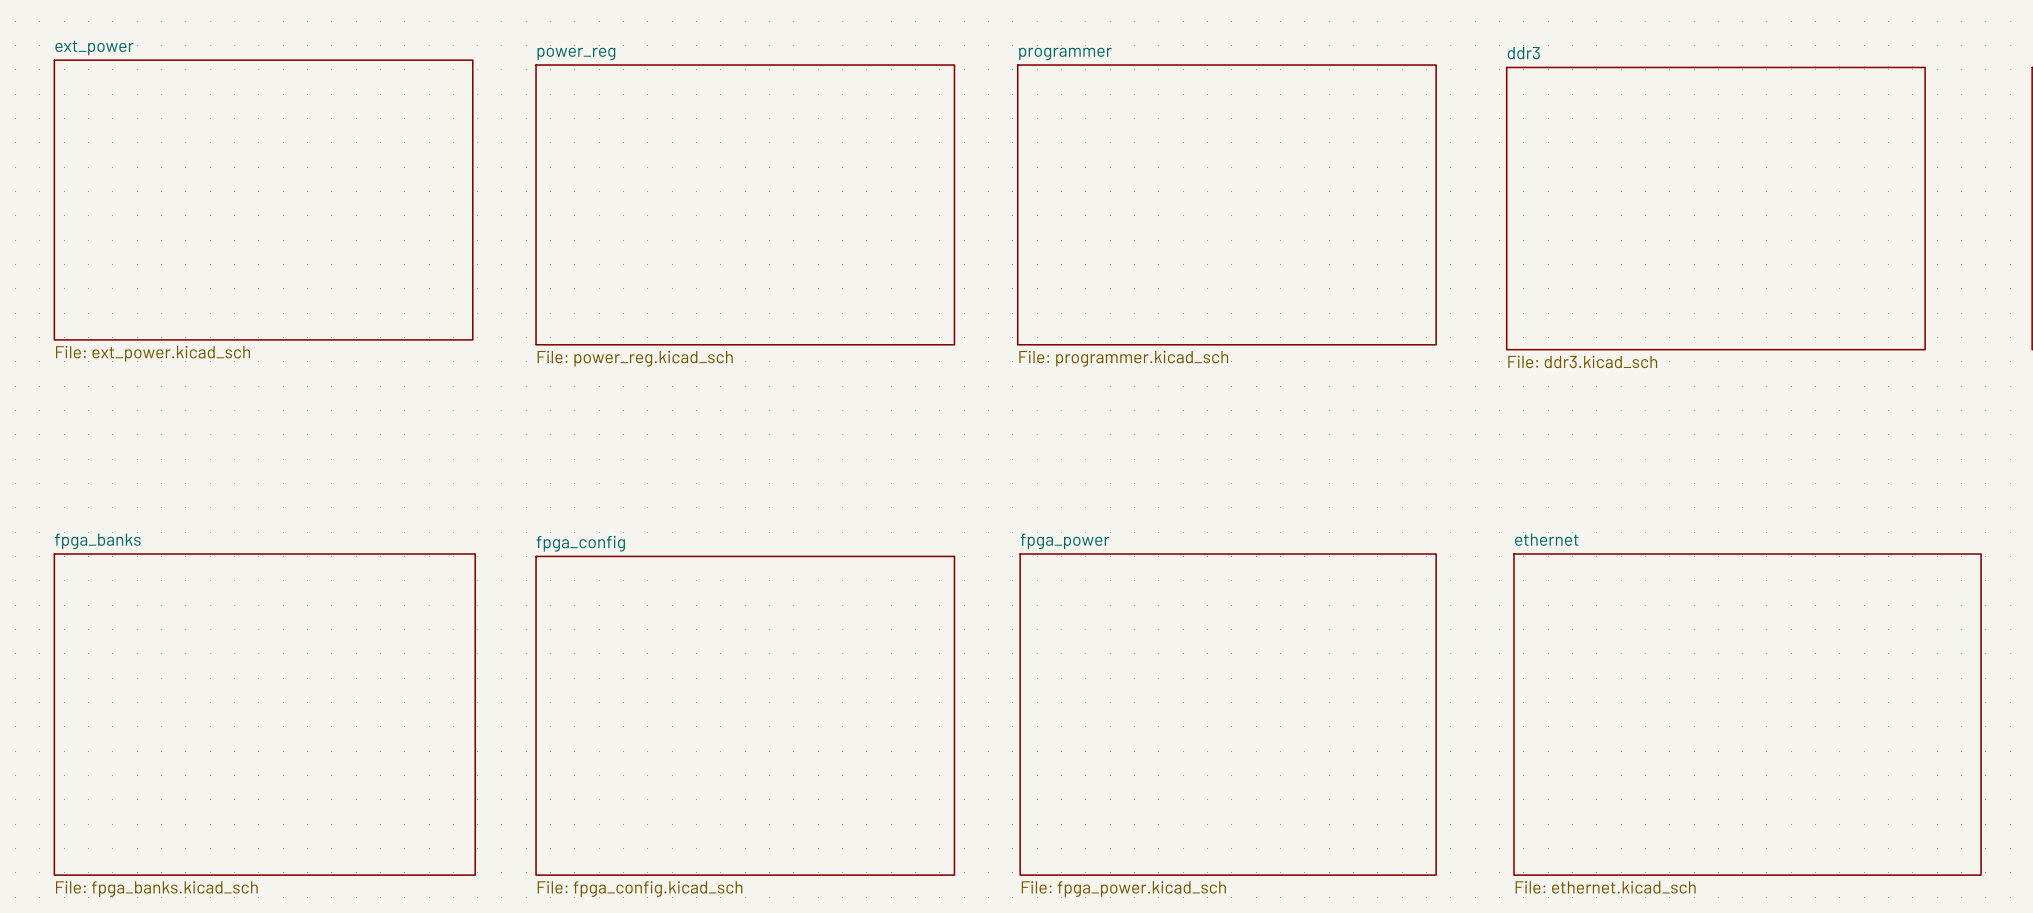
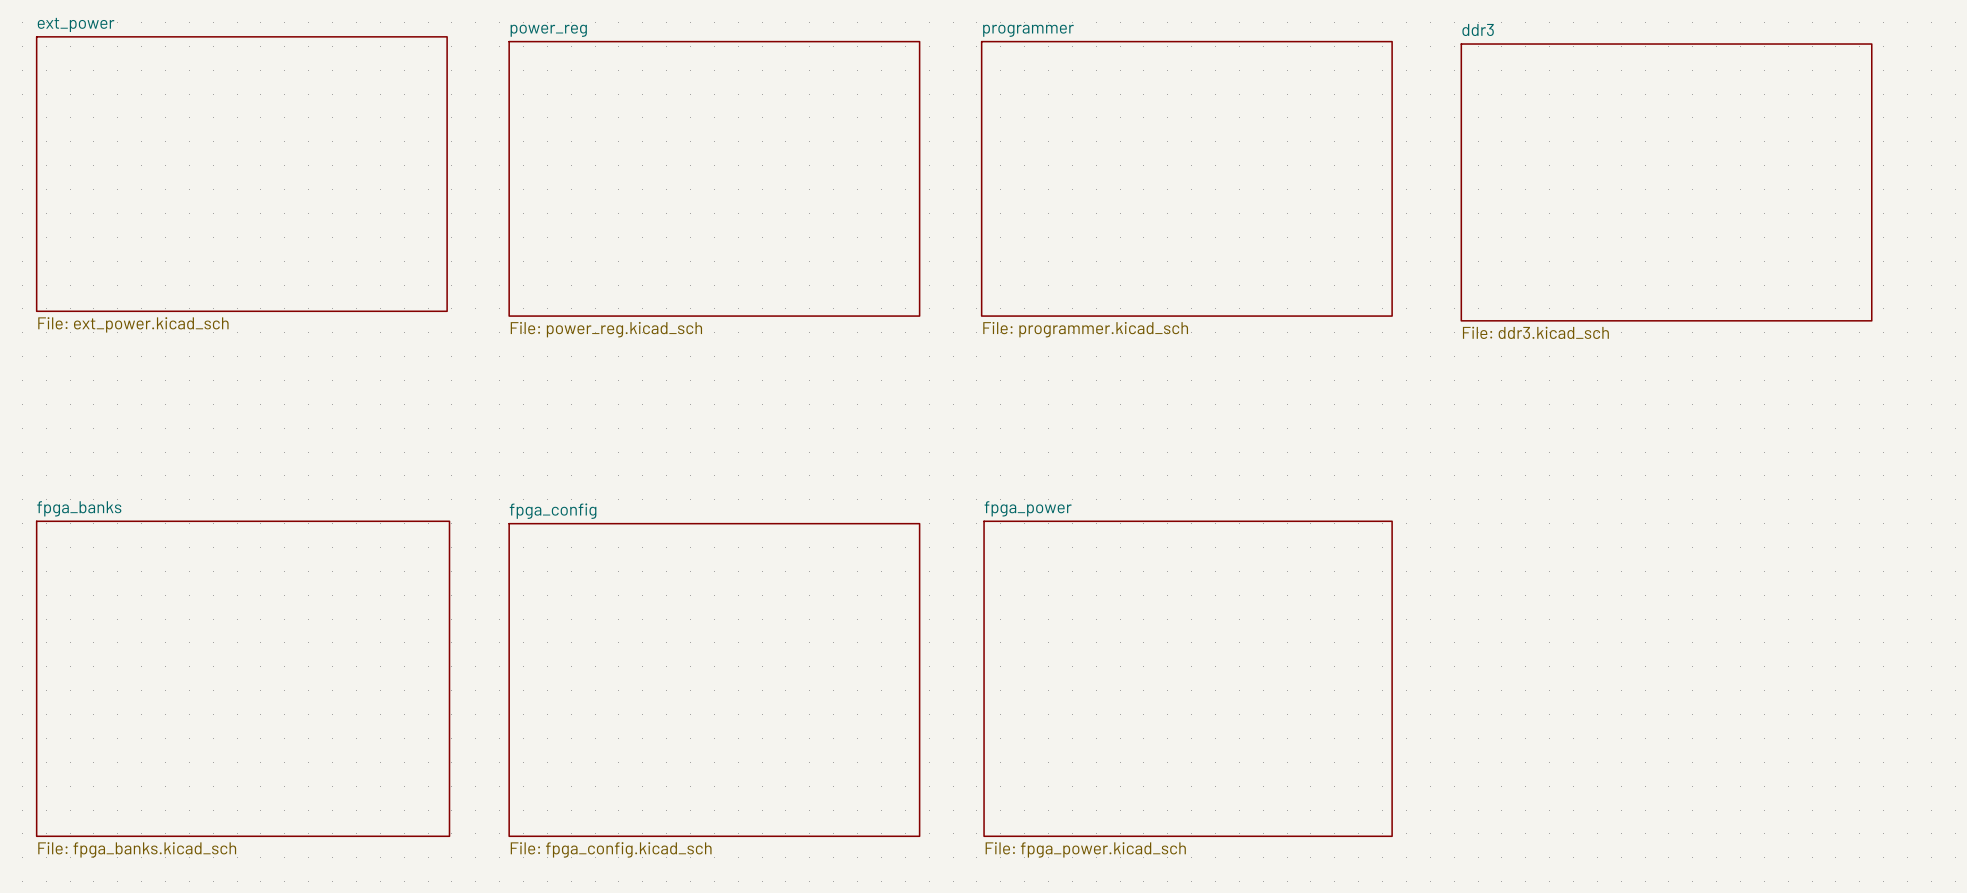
sheet ethernet: File: ethernet.kicad_sch (1747, 714) -> none

